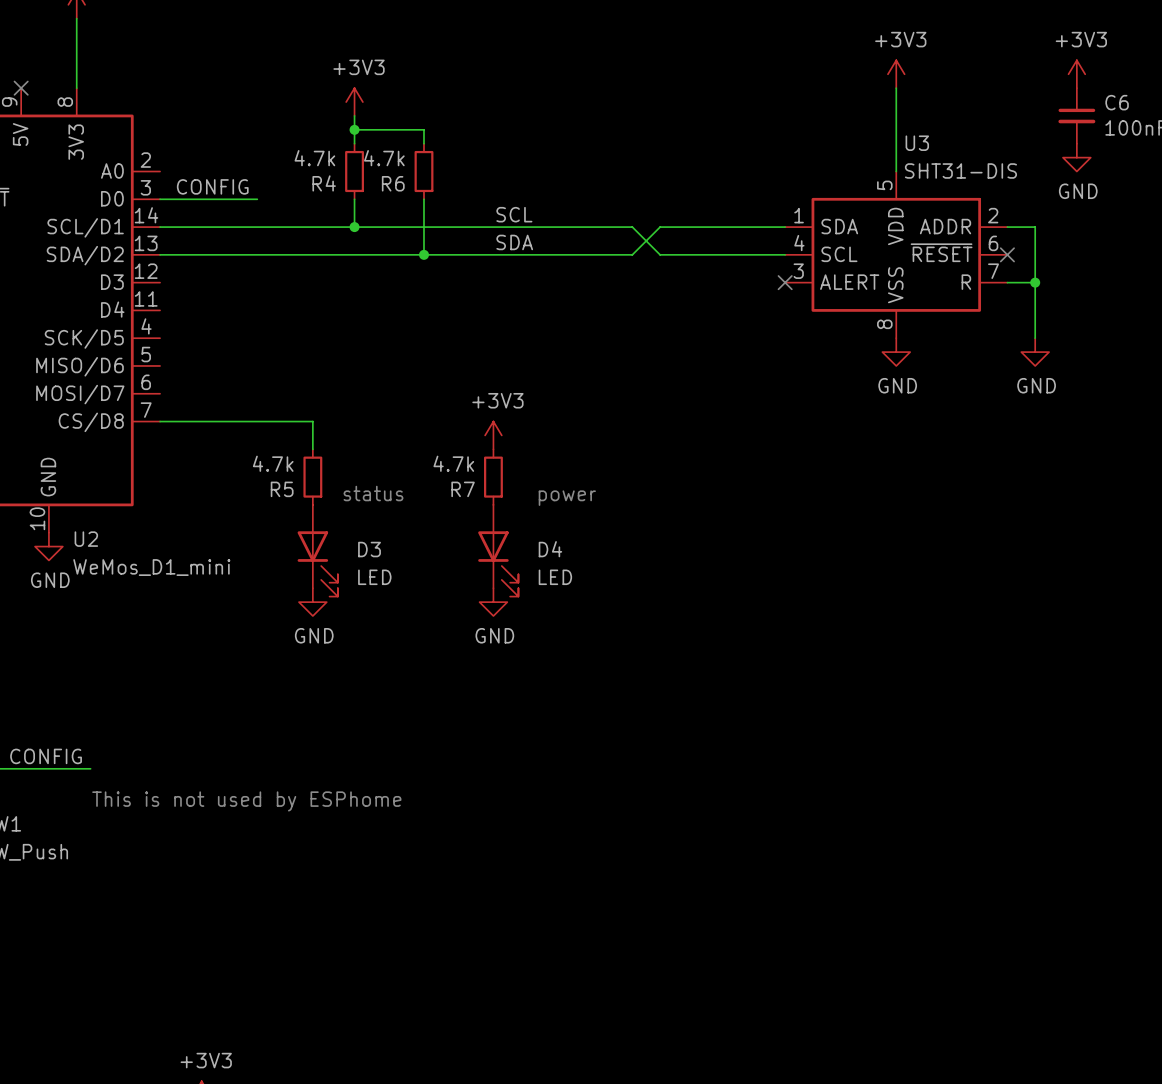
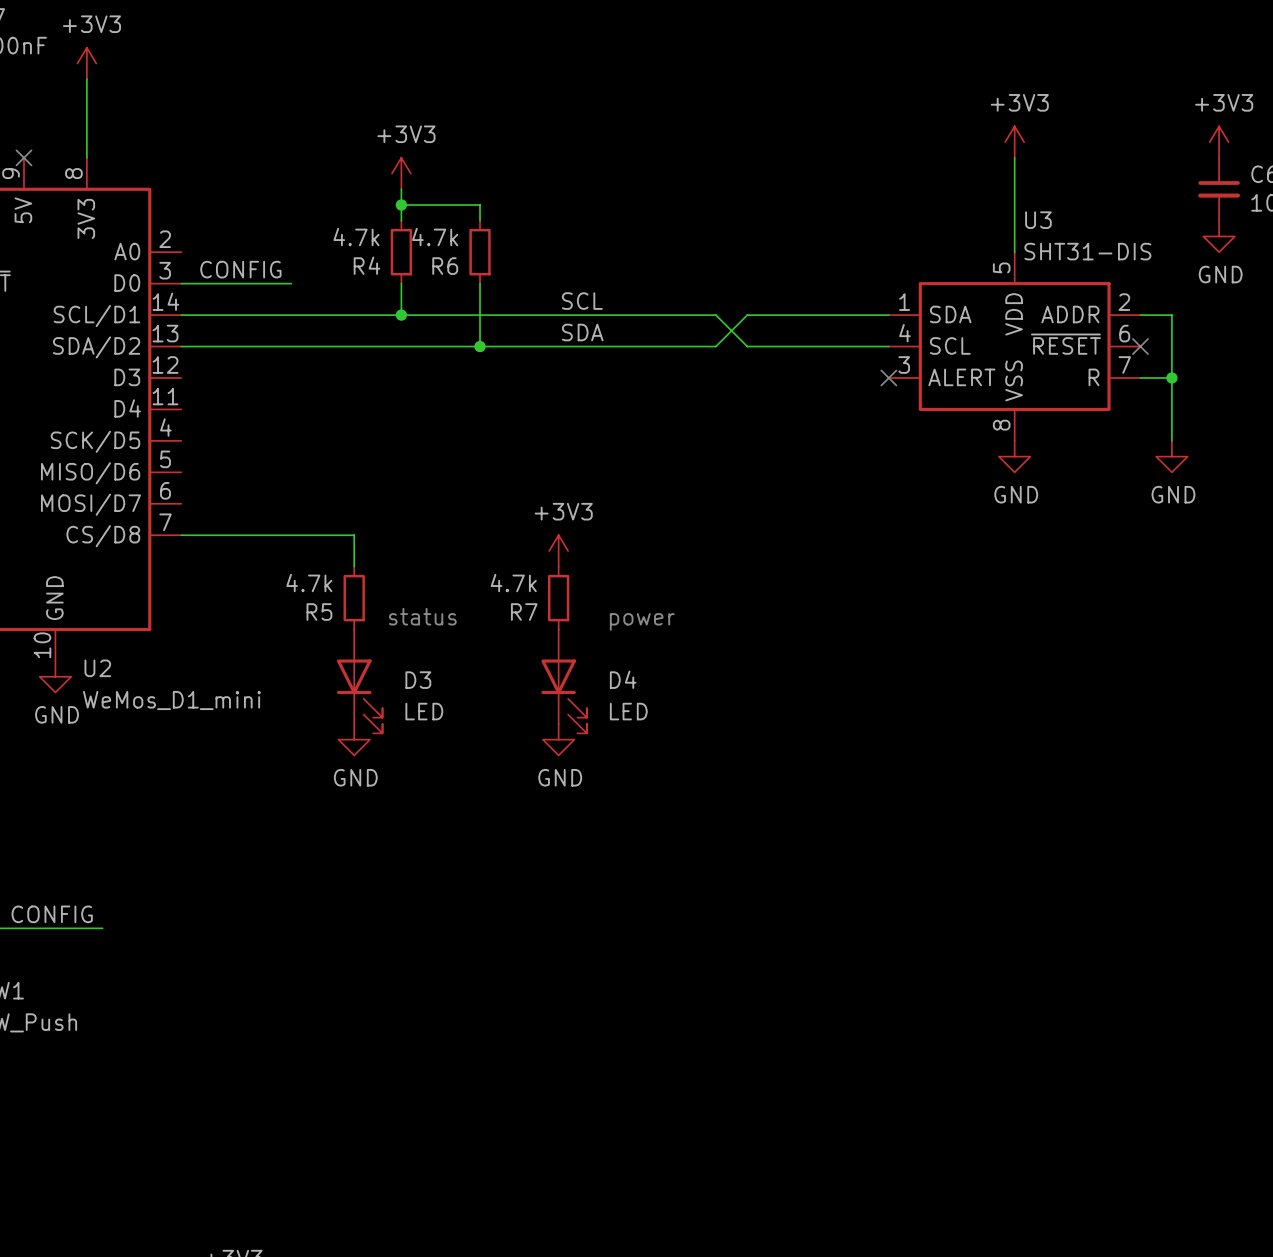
text: This is not used by ESPhome (246, 801) -> none

